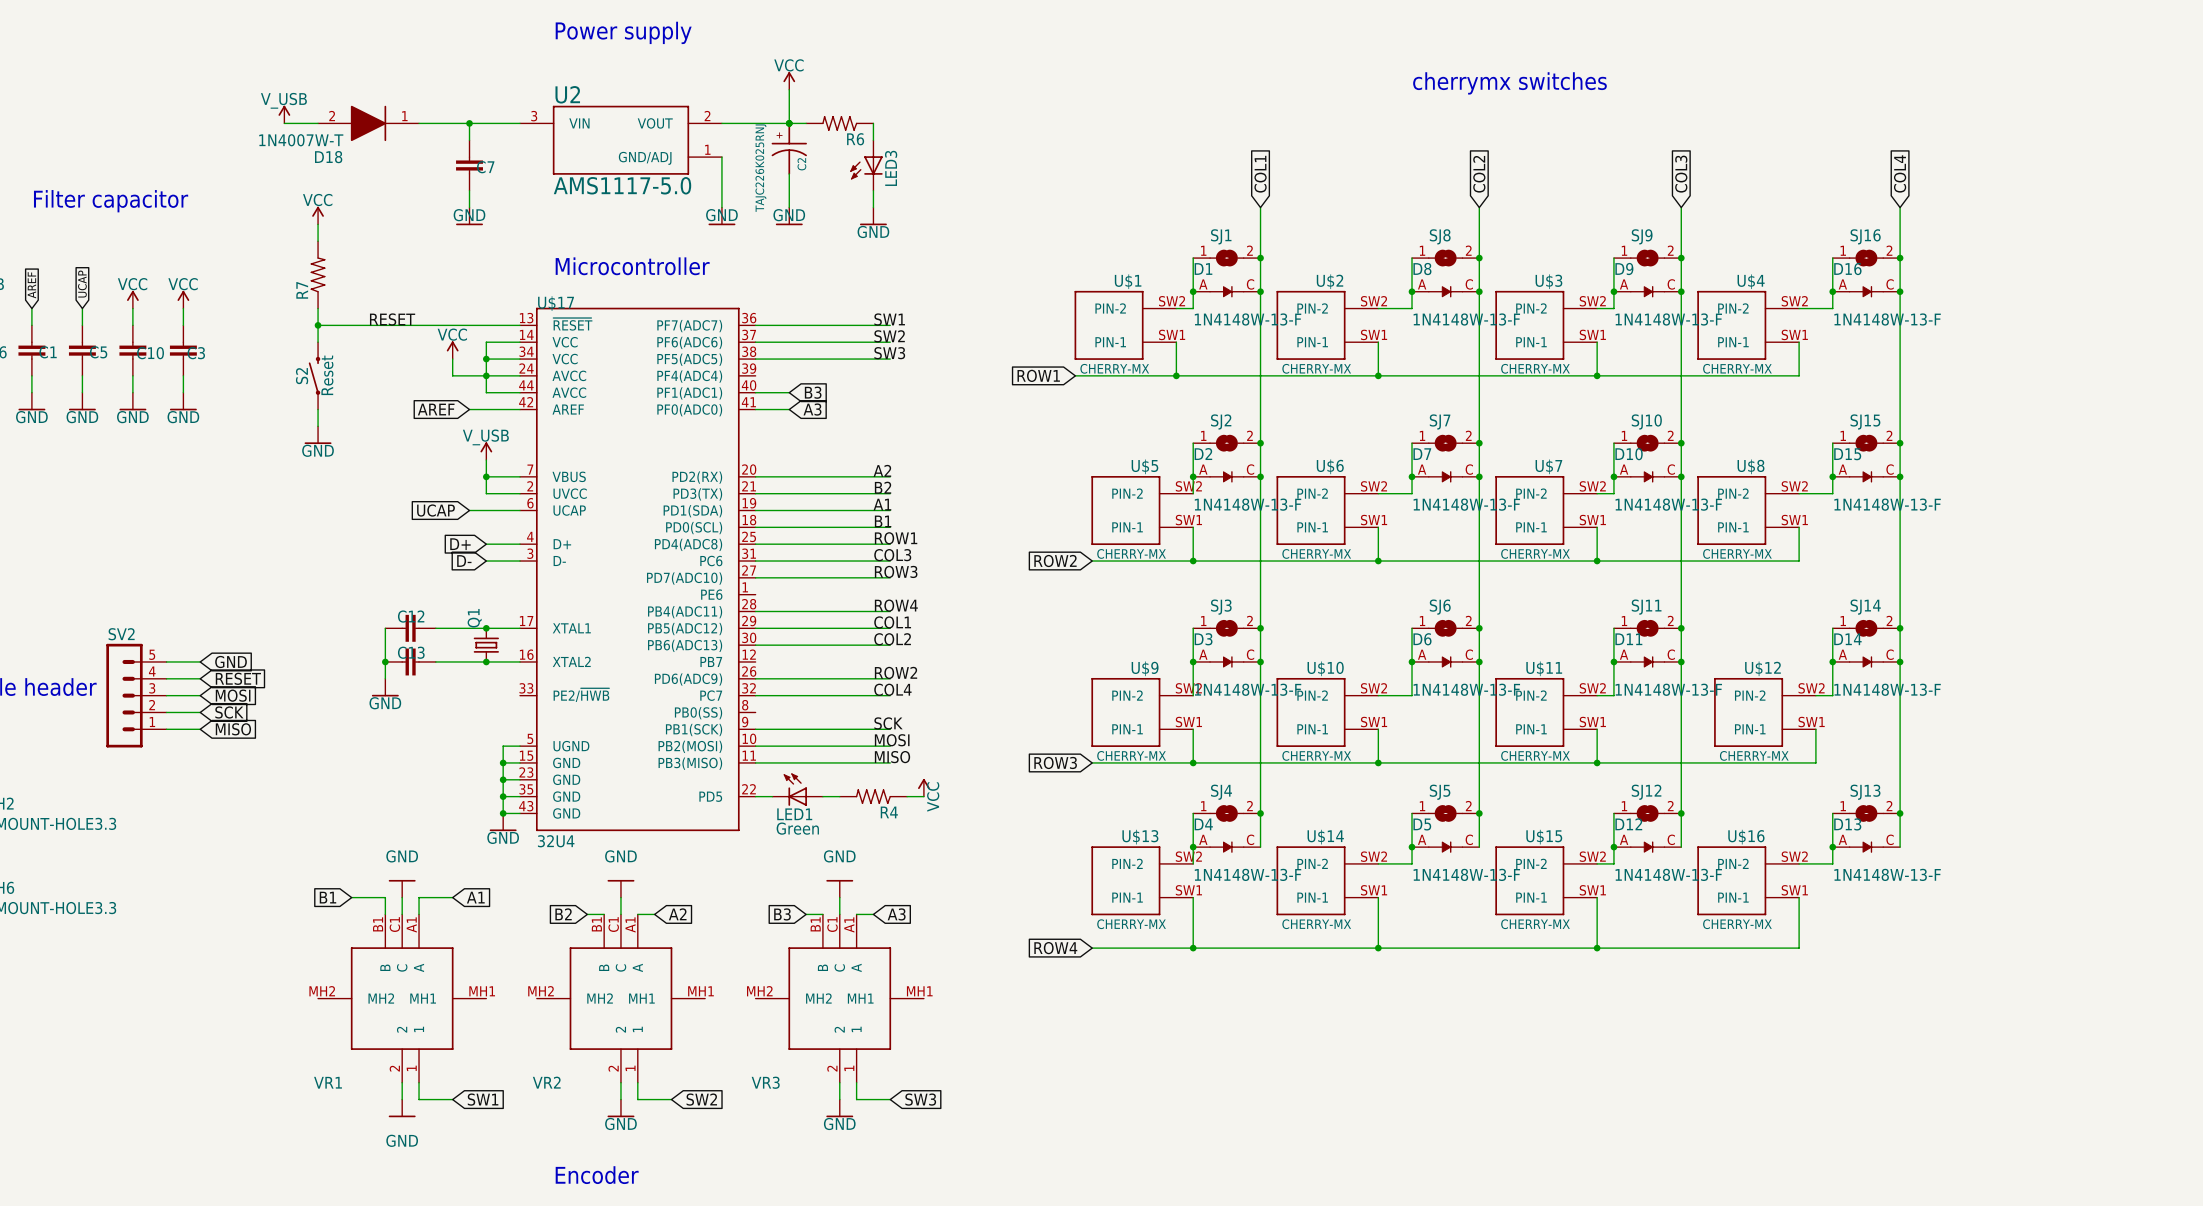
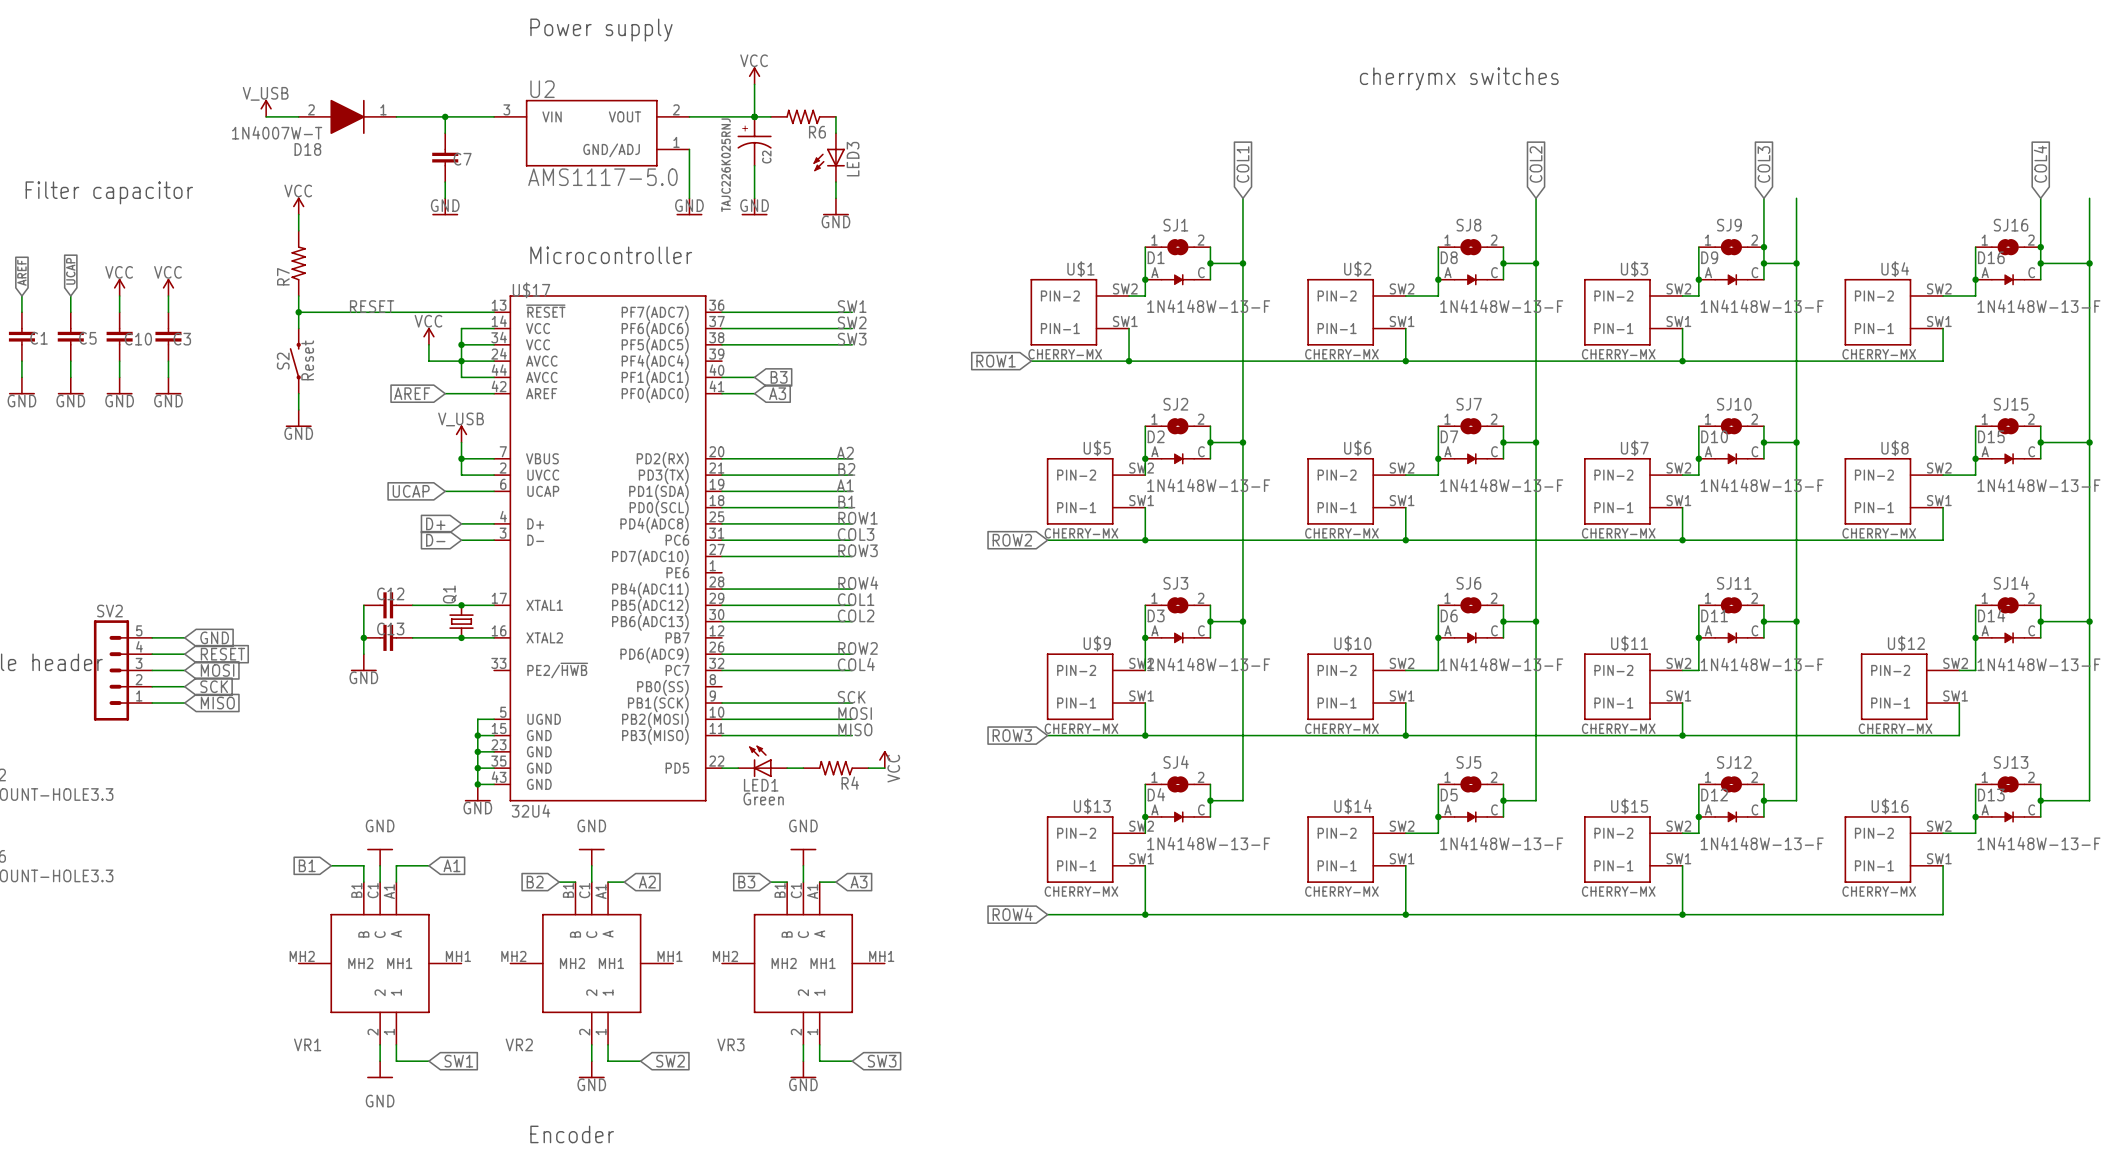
global label: COL4 (1900, 173) -> none
global label: none -> COL4 (2040, 164)
global label position: COL1 (1260, 174) -> COL1 (1242, 164)
global label position: COL2 (1479, 174) -> COL2 (1536, 164)
global label position: COL3 (1681, 174) -> COL3 (1763, 164)
wire: (1260, 207) (1260, 258) -> none
wire: none -> (1242, 198) (1242, 800) (1210, 800)
wire: (1479, 207) (1479, 847) -> none
wire: none -> (1536, 198) (1536, 328)
wire: (1681, 207) (1681, 847) -> none
wire: none -> (1763, 198) (1763, 247)
wire: none -> (1796, 198) (1796, 800) (1763, 800)
wire: (1900, 207) (1900, 847) -> none
wire: none -> (2040, 198) (2040, 279)
wire: none -> (2089, 198) (2089, 800) (2040, 800)
junction: (1260, 258) -> none
wire: (1412, 258) (1412, 308) (1378, 308) -> (1438, 247) (1438, 295) (1405, 295)
SJ8 position: (1445, 258) -> (1470, 247)
junction: (1479, 258) -> none
wire: none -> (1503, 247) (1503, 279)
wire: (1613, 258) (1613, 308) (1597, 308) -> (1698, 247) (1698, 295) (1682, 295)
SJ9 position: (1647, 258) -> (1731, 247)
junction: (1681, 258) -> none
junction: none -> (1763, 247)
SJ16 position: (1866, 258) -> (2008, 247)
junction: (1900, 258) -> none
wire: none -> (1975, 247) (1975, 295) (1943, 295)
junction: none -> (2040, 247)
wire: none -> (1210, 263) (1242, 263)
junction: none -> (1210, 263)
junction: none -> (1242, 263)
wire: none -> (1503, 263) (1536, 263)
junction: none -> (1503, 263)
wire: none -> (1763, 263) (1796, 263)
junction: none -> (1763, 263)
junction: none -> (1796, 263)
wire: none -> (2040, 263) (2089, 263)
junction: none -> (2040, 263)
junction: none -> (2089, 263)
wire: (1260, 291) (1260, 443) -> none
junction: (1260, 291) -> none
junction: (1412, 291) -> none
D8 position: (1445, 291) -> (1470, 279)
junction position: (1479, 291) -> (1438, 279)
junction position: (1613, 291) -> (1536, 263)
D9 position: (1647, 291) -> (1731, 279)
junction: (1681, 291) -> none
junction: none -> (1698, 279)
wire: (1832, 291) (1832, 308) (1799, 308) -> none
junction: (1832, 291) -> none
D16 position: (1866, 291) -> (2008, 279)
junction: (1900, 291) -> none
junction: none -> (1975, 279)
U$2 position: (1327, 325) -> (1356, 312)
U$3 position: (1546, 325) -> (1633, 312)
U$4 position: (1748, 325) -> (1893, 312)
wire: (1378, 342) (1378, 375) -> (1405, 328) (1405, 361)
wire: none -> (1682, 328) (1682, 361)
wire: (1799, 342) (1799, 375) -> (1943, 328) (1943, 361) (1731, 361)
junction: (1378, 375) -> none
junction: none -> (1405, 361)
wire: none -> (1536, 361) (1536, 507)
junction: (1597, 375) -> none
junction: none -> (1682, 361)
junction: (1260, 443) -> none
wire: (1412, 443) (1412, 493) (1378, 493) -> (1438, 426) (1438, 475) (1405, 475)
SJ7 position: (1445, 443) -> (1470, 426)
junction: (1479, 443) -> none
wire: none -> (1503, 426) (1503, 458)
wire: (1613, 443) (1613, 493) (1597, 493) -> (1698, 426) (1698, 475) (1682, 475)
SJ10 position: (1647, 443) -> (1731, 426)
junction: (1681, 443) -> none
SJ15 position: (1866, 443) -> (2008, 426)
junction: (1900, 443) -> none
wire: none -> (1975, 426) (1975, 475) (1943, 475)
wire: none -> (2040, 426) (2040, 458)
wire: none -> (1210, 442) (1242, 442)
junction: none -> (1210, 442)
junction: none -> (1242, 442)
wire: none -> (1503, 442) (1536, 442)
junction: none -> (1503, 442)
junction: none -> (1796, 442)
wire: none -> (2040, 442) (2089, 442)
junction: none -> (2040, 442)
junction: none -> (2089, 442)
wire: (1260, 476) (1260, 628) -> none
junction: (1260, 476) -> none
junction: (1412, 476) -> none
D7 position: (1445, 476) -> (1470, 458)
junction position: (1479, 476) -> (1438, 458)
junction position: (1613, 476) -> (1536, 442)
D10 position: (1647, 476) -> (1731, 458)
junction: (1681, 476) -> none
junction: none -> (1698, 458)
wire: (1832, 476) (1832, 493) (1799, 493) -> none
junction position: (1832, 476) -> (1763, 442)
D15 position: (1866, 476) -> (2008, 458)
junction: (1900, 476) -> none
junction: none -> (1975, 458)
U$6 position: (1327, 510) -> (1356, 491)
U$7 position: (1546, 510) -> (1633, 491)
U$8 position: (1748, 510) -> (1893, 491)
wire: (1378, 527) (1378, 561) -> (1405, 507) (1405, 540)
wire: none -> (1682, 507) (1682, 540)
wire: (1799, 527) (1799, 561) -> (1943, 507) (1943, 540) (1731, 540)
junction: (1378, 561) -> none
junction: none -> (1405, 540)
wire: none -> (1536, 540) (1536, 703)
junction: (1597, 561) -> none
junction: none -> (1682, 540)
junction: (1260, 628) -> none
wire: (1412, 628) (1412, 695) (1378, 695) -> (1438, 605) (1438, 670) (1405, 670)
SJ6 position: (1445, 628) -> (1470, 605)
junction: (1479, 628) -> none
wire: none -> (1503, 605) (1503, 637)
wire: (1613, 628) (1613, 695) (1597, 695) -> (1698, 605) (1698, 670) (1682, 670)
SJ11 position: (1647, 628) -> (1731, 605)
junction: (1681, 628) -> none
SJ14 position: (1866, 628) -> (2008, 605)
junction: (1900, 628) -> none
wire: none -> (1975, 605) (1975, 670) (1959, 670)
wire: none -> (2040, 605) (2040, 637)
wire: none -> (1210, 621) (1242, 621)
junction: none -> (1210, 621)
junction: none -> (1242, 621)
wire: none -> (1503, 621) (1536, 621)
junction: none -> (1503, 621)
wire: none -> (1763, 621) (1796, 621)
junction: none -> (1796, 621)
wire: none -> (2040, 621) (2089, 621)
junction: none -> (2040, 621)
junction: none -> (2089, 621)
wire: (1260, 661) (1260, 813) -> none
junction: (1260, 661) -> none
junction: (1412, 661) -> none
D6 position: (1445, 661) -> (1470, 637)
junction position: (1479, 661) -> (1438, 637)
junction position: (1613, 661) -> (1536, 621)
D11 position: (1647, 661) -> (1731, 637)
junction: (1681, 661) -> none
junction: none -> (1698, 637)
wire: (1832, 661) (1832, 695) (1815, 695) -> none
junction position: (1832, 661) -> (1763, 621)
D14 position: (1866, 661) -> (2008, 637)
junction: (1900, 661) -> none
junction: none -> (1975, 637)
U$10 position: (1327, 712) -> (1356, 686)
U$11 position: (1546, 712) -> (1633, 686)
U$12 position: (1765, 712) -> (1910, 686)
wire: (1378, 729) (1378, 762) -> (1405, 703) (1405, 735)
wire: none -> (1682, 703) (1682, 735)
wire: (1815, 729) (1815, 762) -> (1959, 703) (1959, 735) (1747, 735)
junction: (1378, 762) -> none
junction: none -> (1405, 735)
wire: none -> (1536, 735) (1536, 800) (1503, 800)
junction: (1597, 762) -> none
junction: none -> (1682, 735)
junction position: (1260, 813) -> (1210, 800)
wire: (1412, 813) (1412, 863) (1378, 863) -> (1438, 784) (1438, 833) (1405, 833)
SJ5 position: (1445, 813) -> (1470, 784)
junction: (1479, 813) -> none
wire: none -> (1503, 784) (1503, 816)
wire: (1613, 813) (1613, 863) (1597, 863) -> (1698, 784) (1698, 833) (1682, 833)
SJ12 position: (1647, 813) -> (1731, 784)
junction: (1681, 813) -> none
SJ13 position: (1866, 813) -> (2008, 784)
junction: (1900, 813) -> none
wire: none -> (1975, 784) (1975, 833) (1943, 833)
wire: none -> (2040, 784) (2040, 816)
junction: none -> (1503, 800)
junction: none -> (2040, 800)
junction: (1412, 847) -> none
D5 position: (1445, 847) -> (1470, 816)
junction: none -> (1438, 816)
junction: (1613, 847) -> none
D12 position: (1647, 847) -> (1731, 816)
junction: none -> (1698, 816)
wire: (1832, 847) (1832, 863) (1799, 863) -> none
junction position: (1832, 847) -> (1763, 800)
D13 position: (1866, 847) -> (2008, 816)
junction: none -> (1975, 816)
U$14 position: (1327, 880) -> (1356, 849)
U$15 position: (1546, 880) -> (1633, 849)
U$16 position: (1748, 880) -> (1893, 849)
wire: (1378, 897) (1378, 948) -> (1405, 865) (1405, 914)
wire: (1597, 897) (1597, 948) -> (1682, 865) (1682, 914)
wire: (1799, 897) (1799, 948) -> (1943, 865) (1943, 914) (1731, 914)
junction: (1378, 948) -> none
junction: none -> (1405, 914)
junction: (1597, 948) -> none
junction: none -> (1682, 914)

